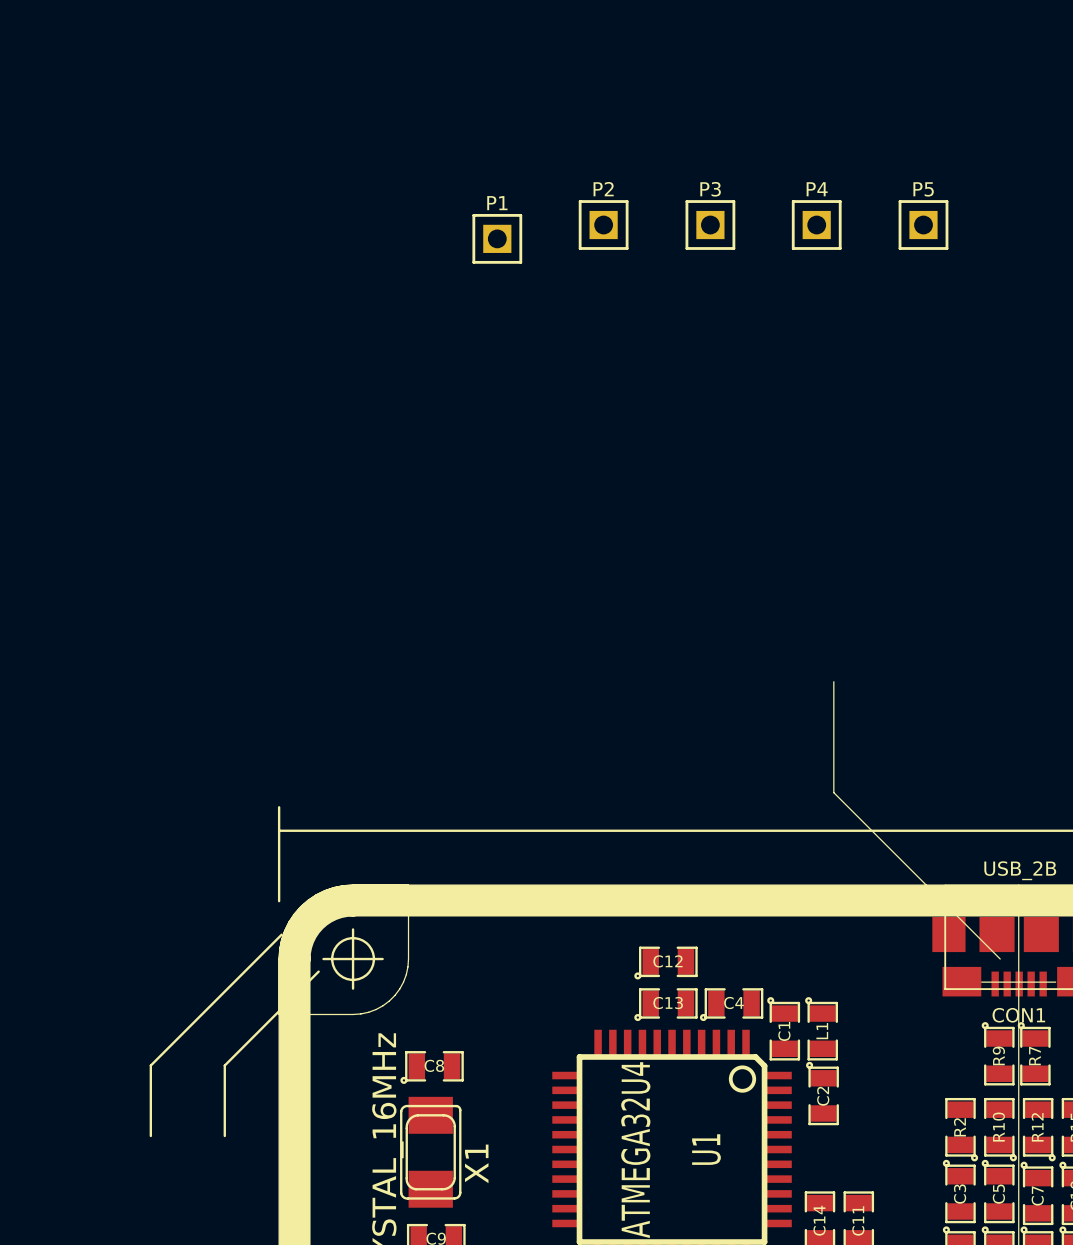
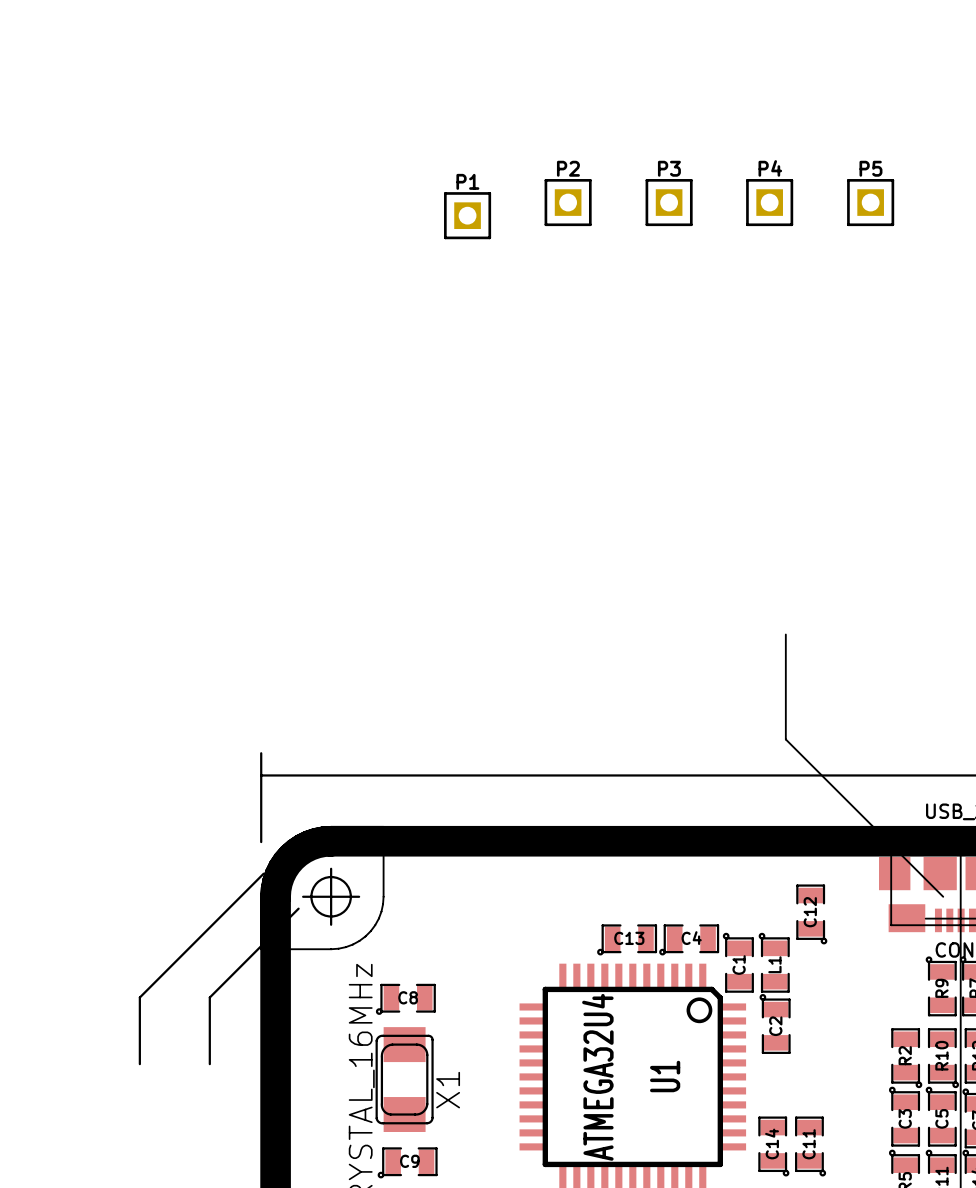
C12 rotation: 0° (666, 963) -> 90° counterclockwise (811, 914)
C12 position: (666, 963) -> (811, 914)

